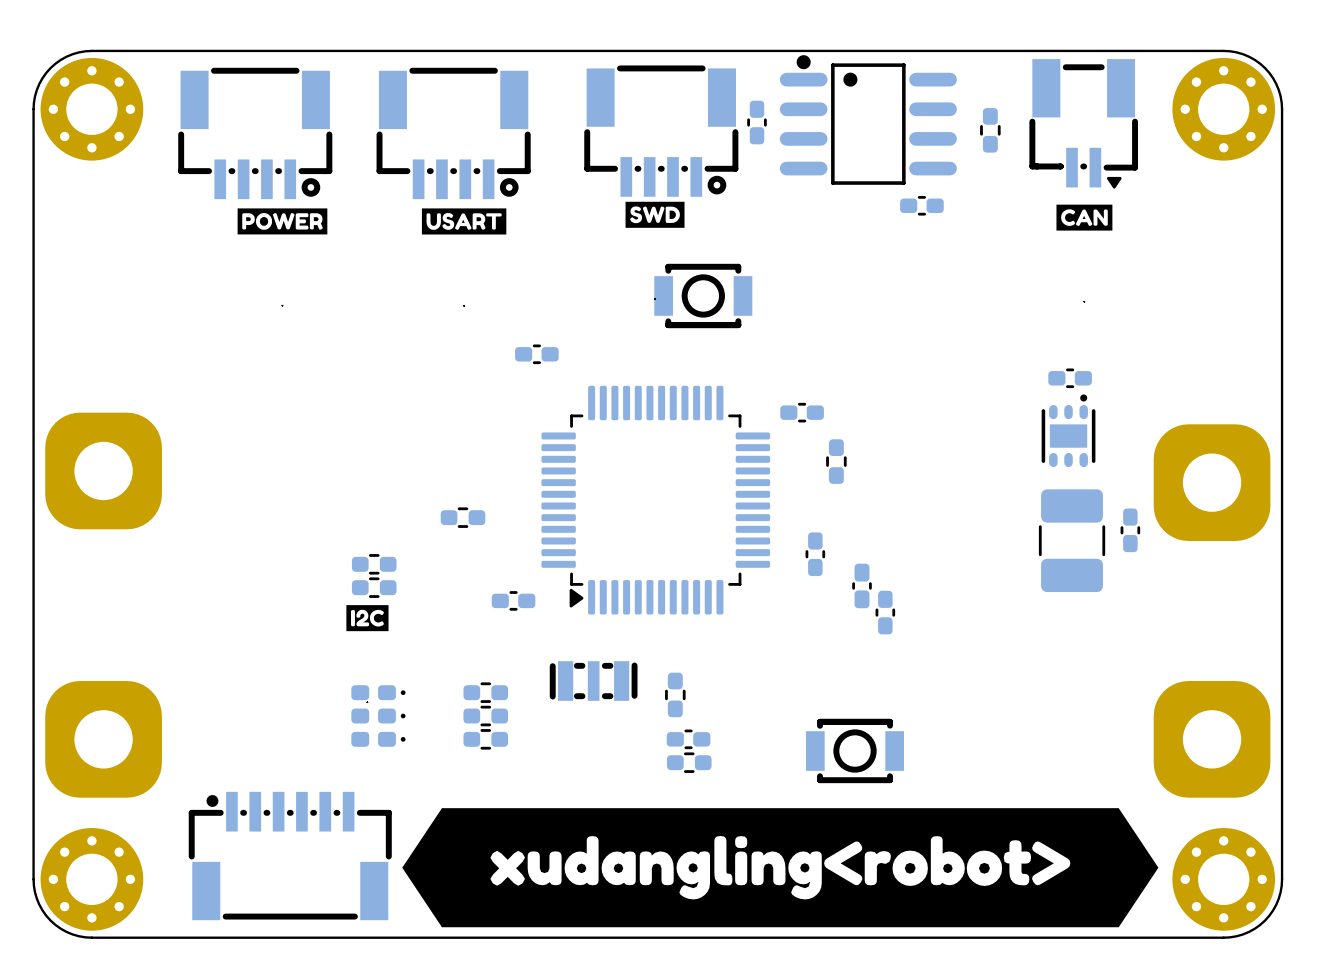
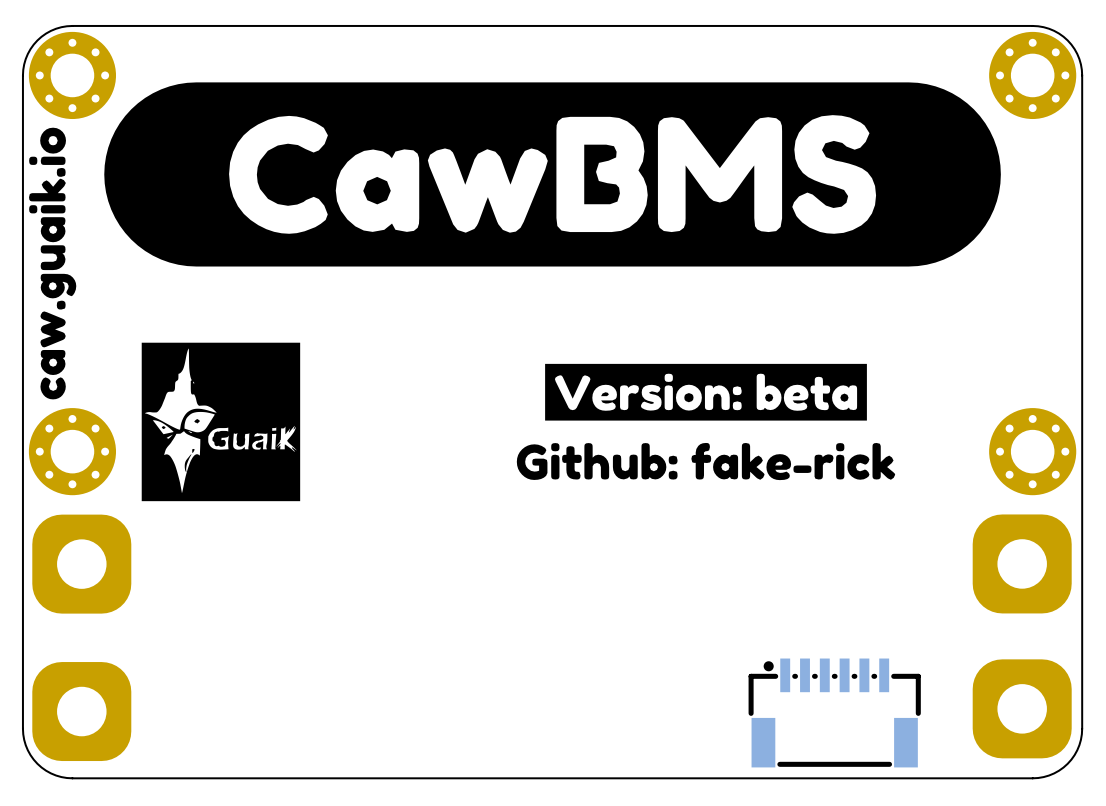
part: (868, 119) -> none
part: (756, 122) -> none
part: (1083, 123) -> none
part: (990, 130) -> none
part: (661, 131) -> none
part: (255, 133) -> none
part: (453, 133) -> none
drawing: none -> [29, 127, 77, 400]
drawing shape: [625, 201, 685, 299] -> [104, 82, 1001, 267]
drawing: [1056, 204, 1113, 231] -> none
part: (921, 205) -> none
drawing: [237, 208, 328, 235] -> none
drawing: [421, 208, 507, 235] -> none
part: (703, 295) -> none
part: (536, 354) -> none
part: (1070, 378) -> none
part: (802, 412) -> none
drawing: none -> [141, 342, 301, 502]
part: (1068, 430) -> none
drawing: none -> [516, 363, 896, 481]
part: (836, 461) -> none
part: (103, 470) -> none
part: (1212, 482) -> none
part: (655, 500) -> none
part: (463, 517) -> none
part: (1130, 530) -> none
part: (1072, 540) -> none
part: none -> (72, 451)
part: (815, 554) -> none
part: (374, 564) -> none
part: (862, 585) -> none
part: (374, 587) -> none
part: (513, 600) -> none
drawing: [346, 605, 389, 632] -> none
part: (885, 612) -> none
part: (593, 681) -> none
part: (378, 692) -> none
part: (485, 692) -> none
part: (675, 694) -> none
part: (378, 716) -> none
part: (485, 716) -> none
part position: (103, 739) -> (81, 564)
part: (378, 739) -> none
part: (485, 739) -> none
part: (688, 739) -> none
part position: (1212, 739) -> (1022, 563)
part: (855, 751) -> none
part: (689, 762) -> none
drawing: [402, 808, 1159, 928] -> none
part footprint: [40, 828, 144, 931] -> [32, 662, 132, 762]
part: none -> (1022, 708)
part: (290, 856) -> none
part: none -> (834, 712)
part position: (1223, 879) -> (1032, 451)

